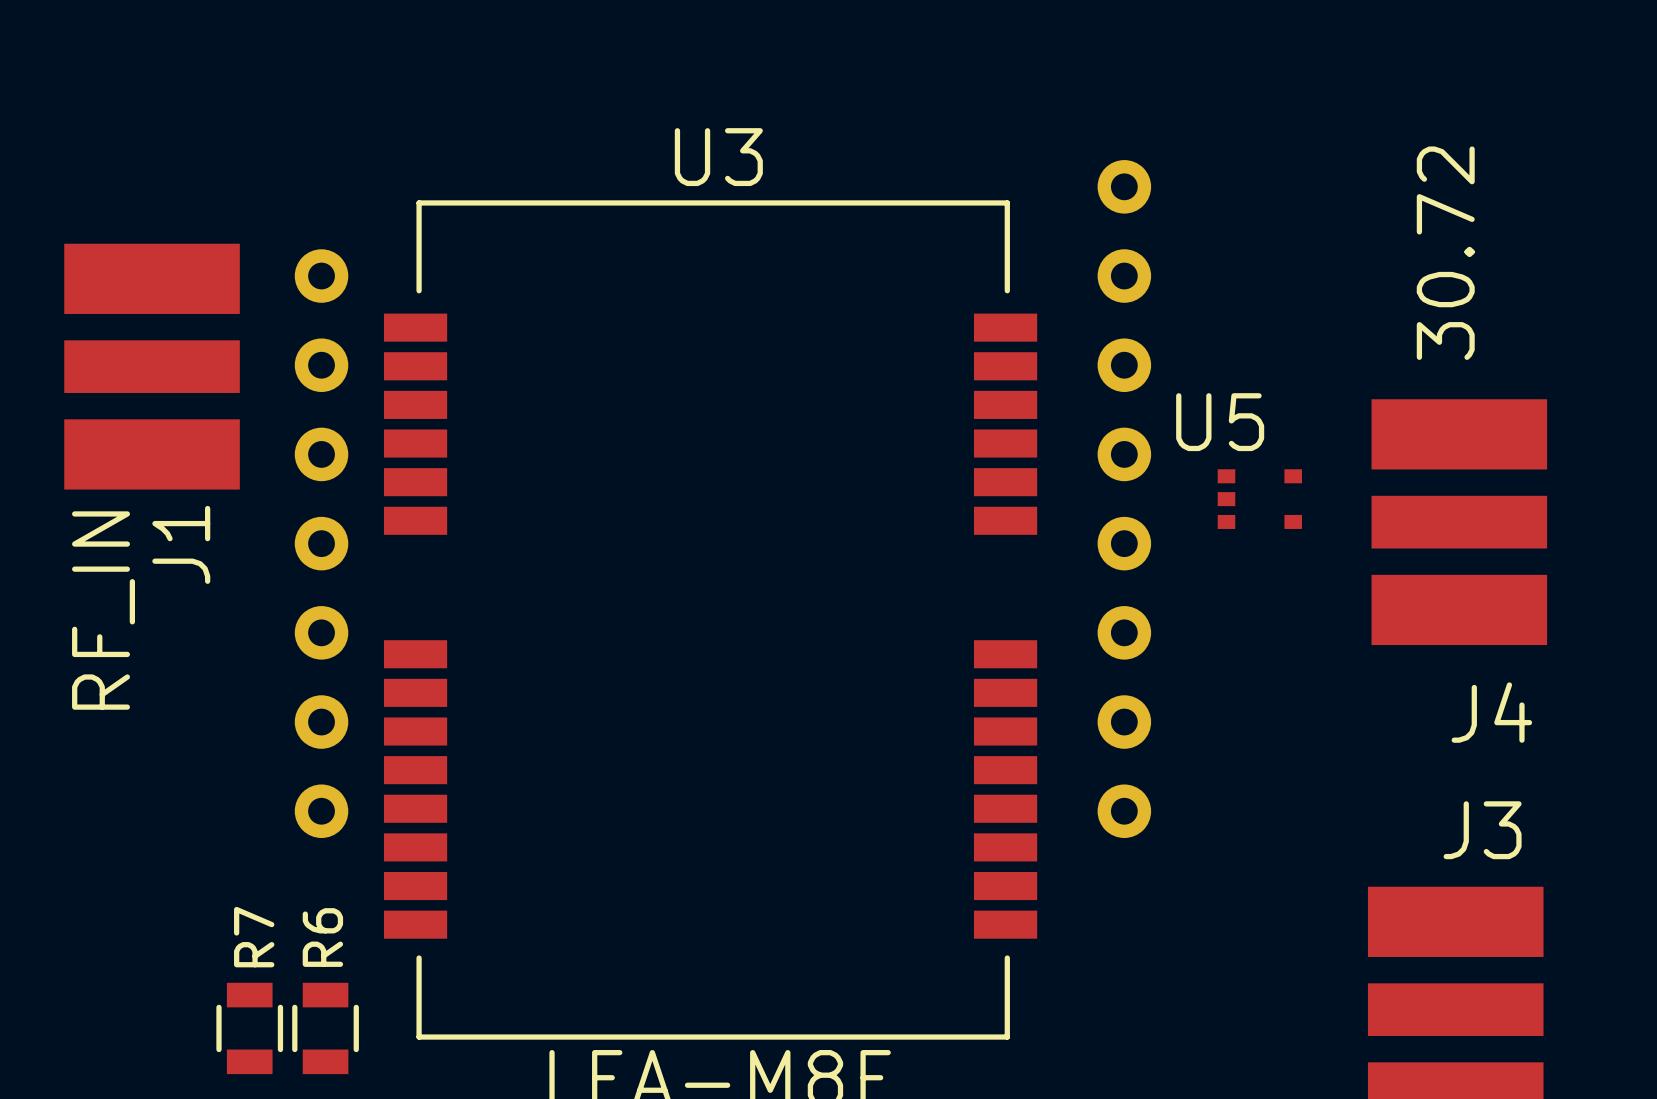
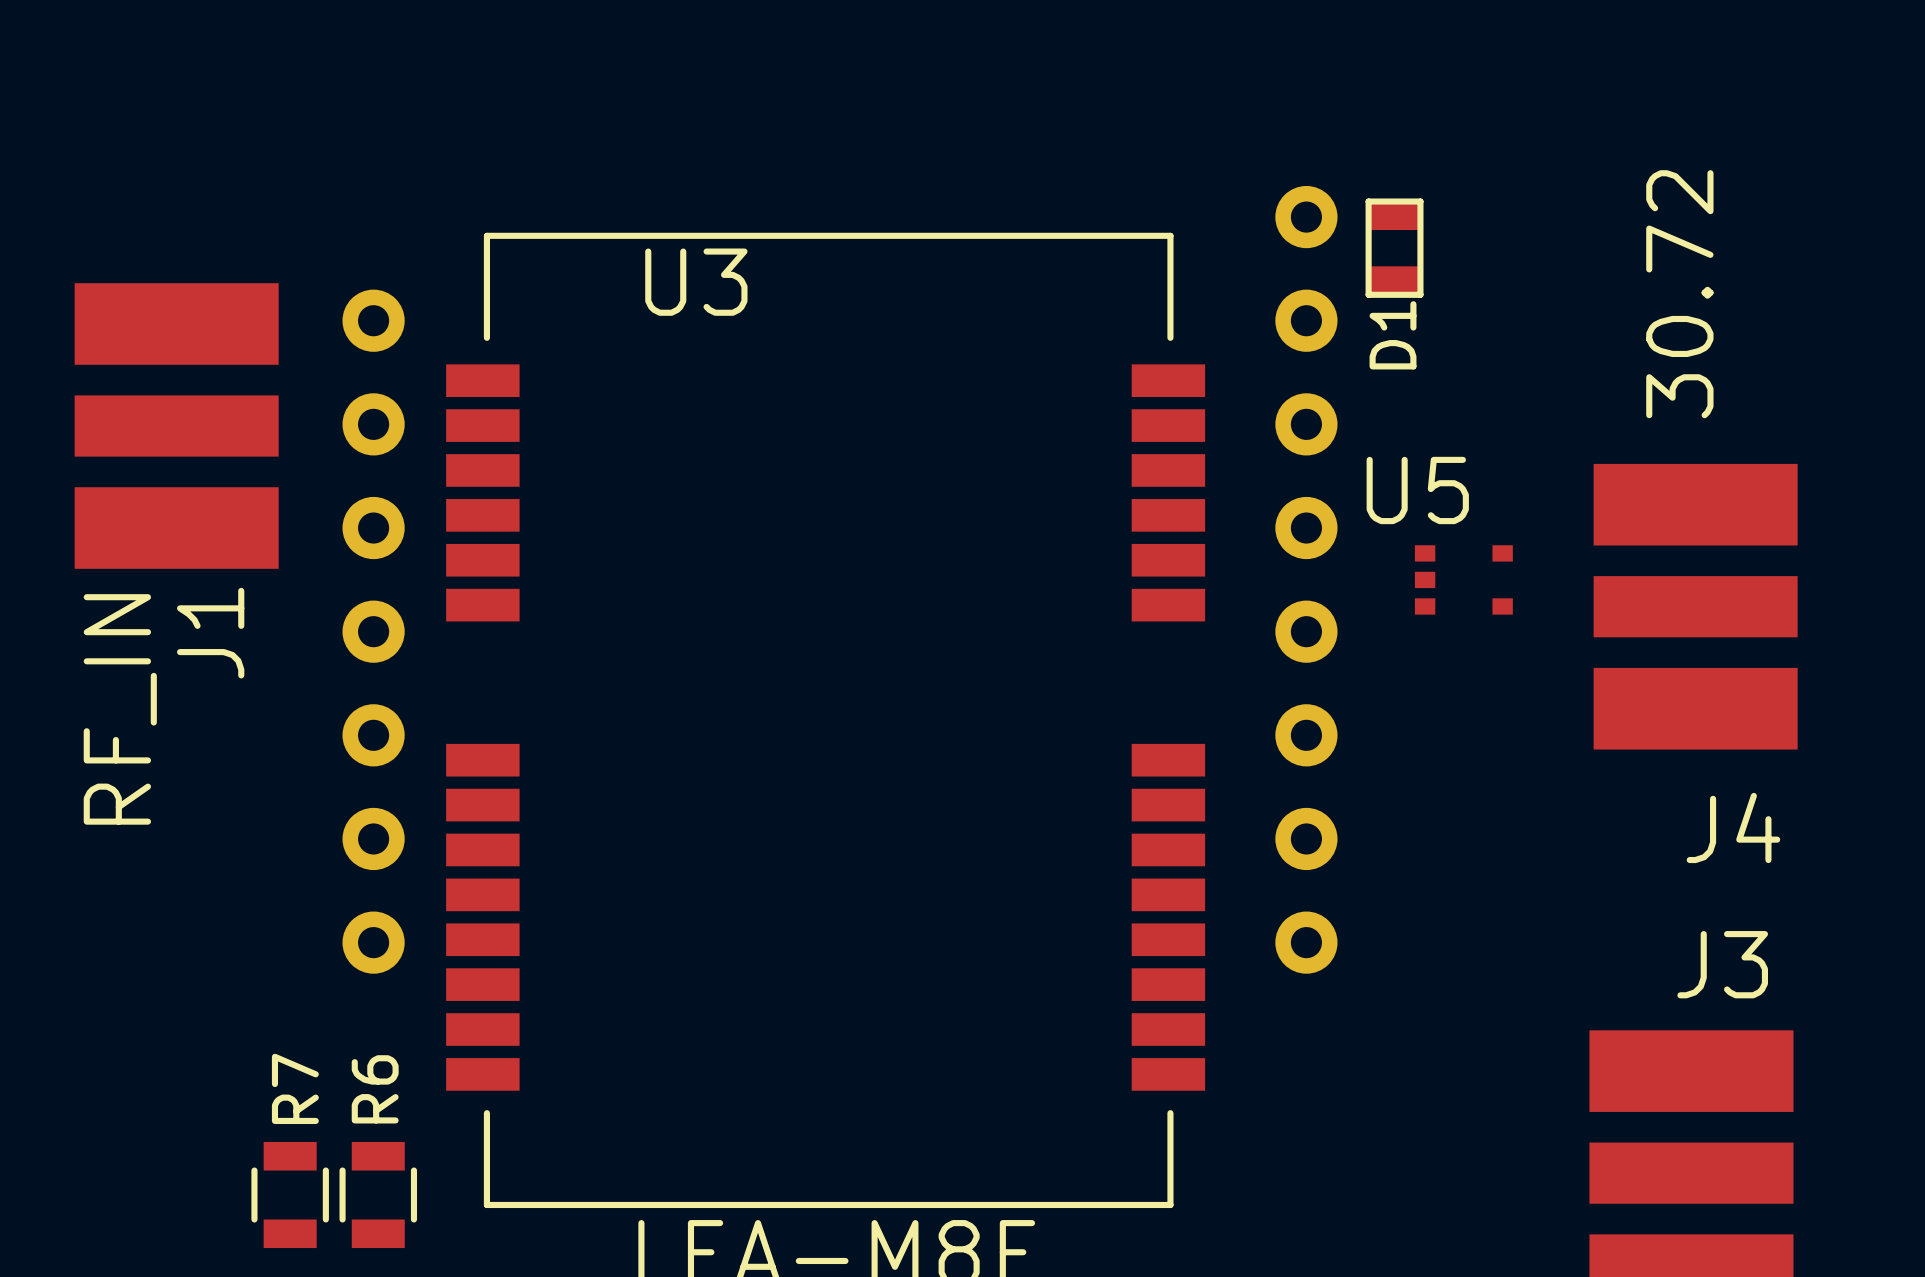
U3 name position: U3 (718, 157) -> U3 (696, 282)
D1: none -> (1394, 248)

